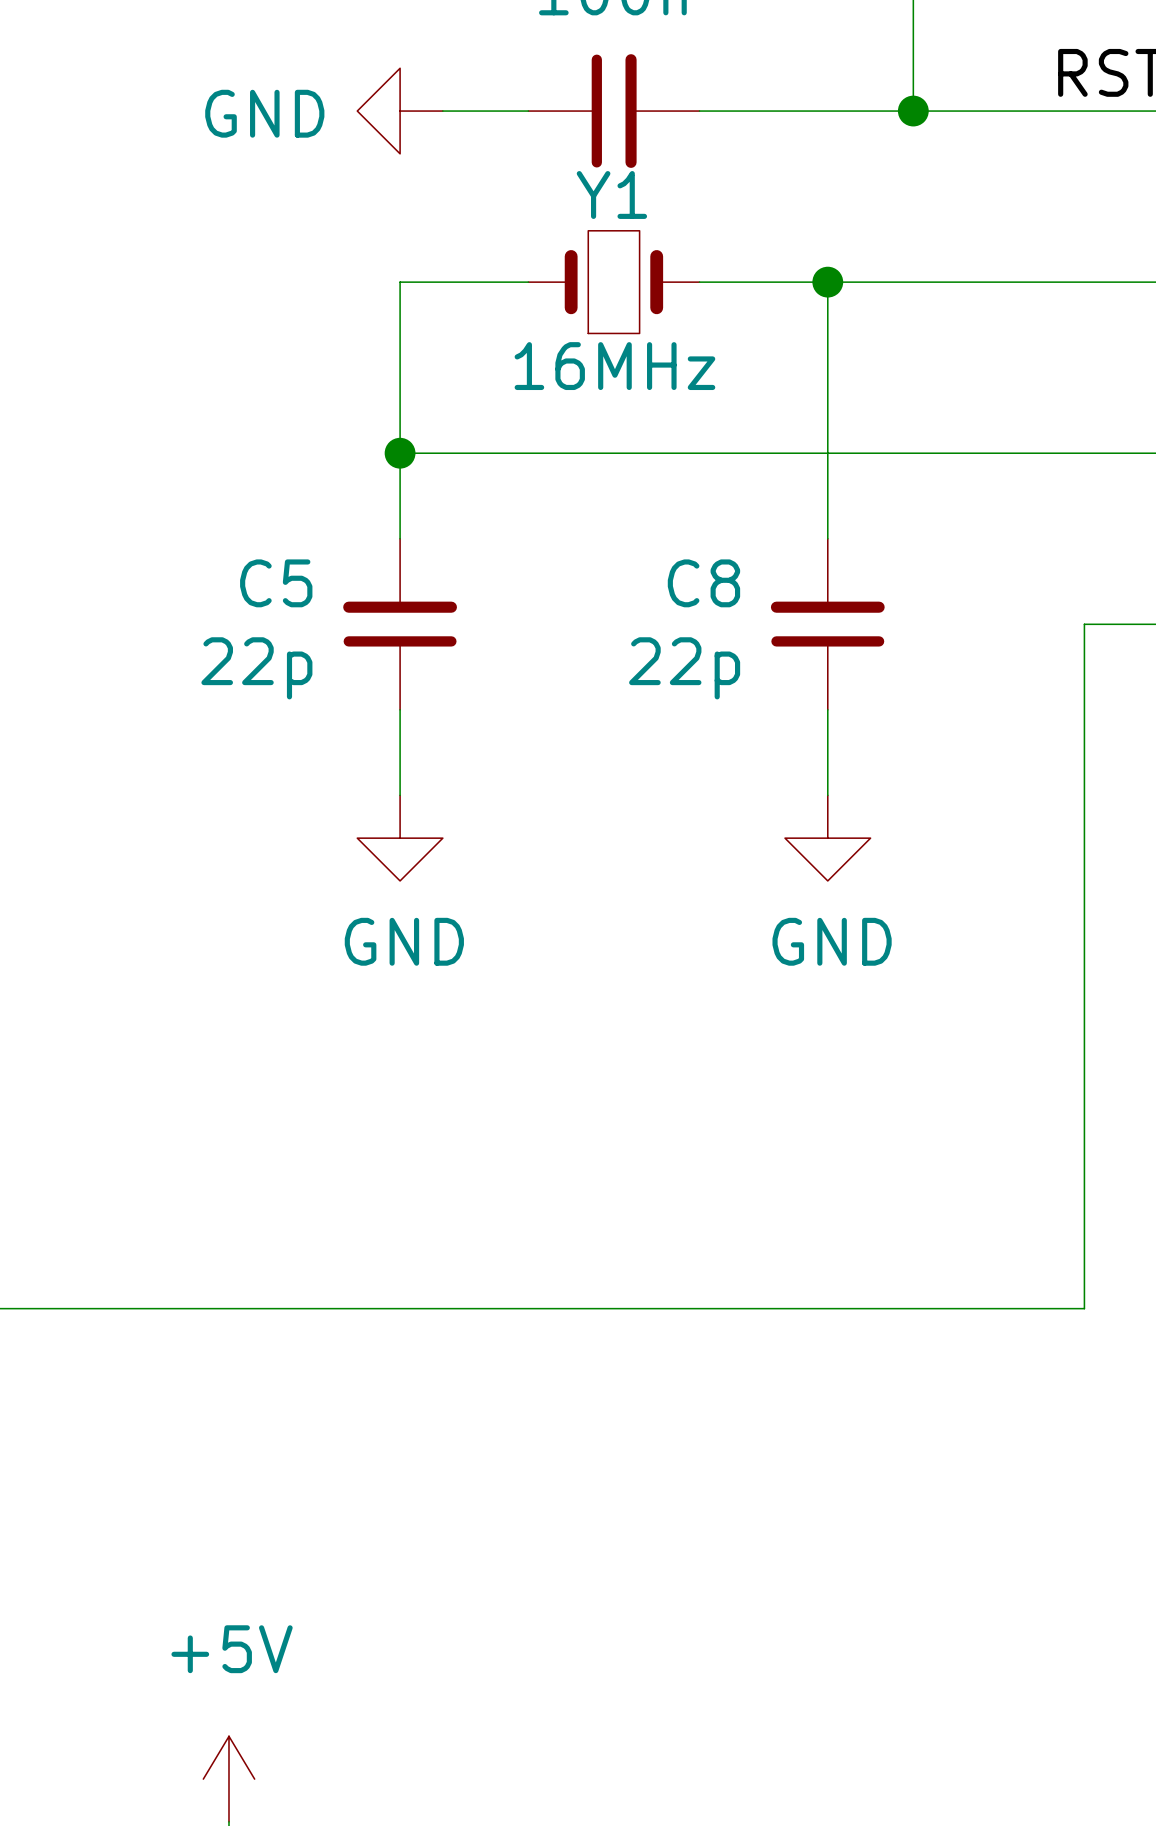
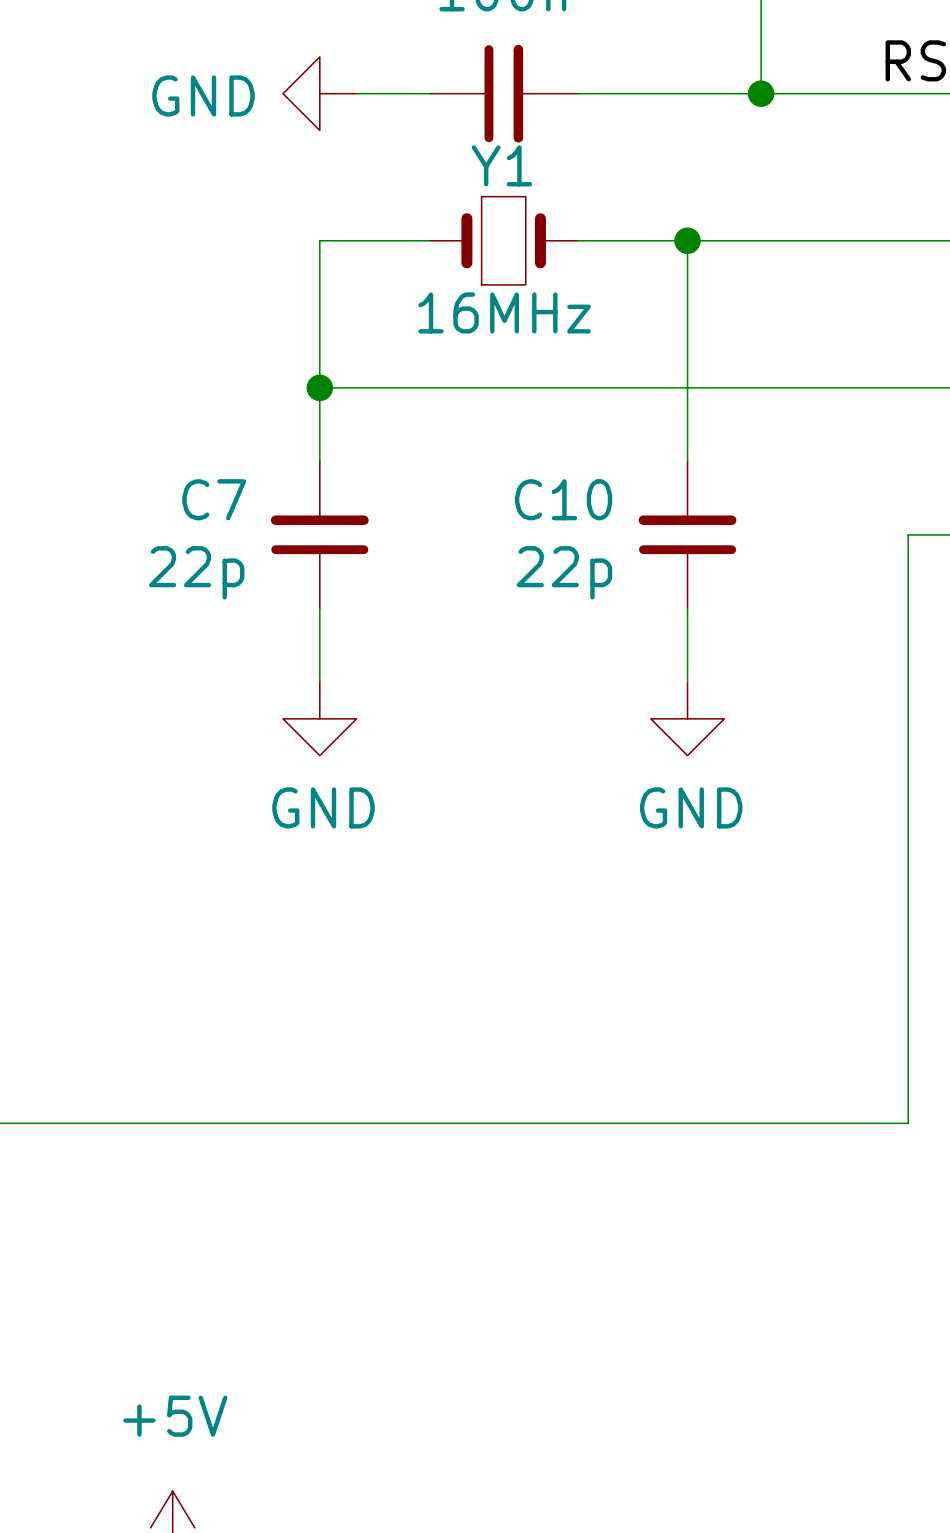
C5 name: C5 (276, 583) -> C7 (214, 499)
C8 name: C8 (703, 583) -> C10 (563, 499)

